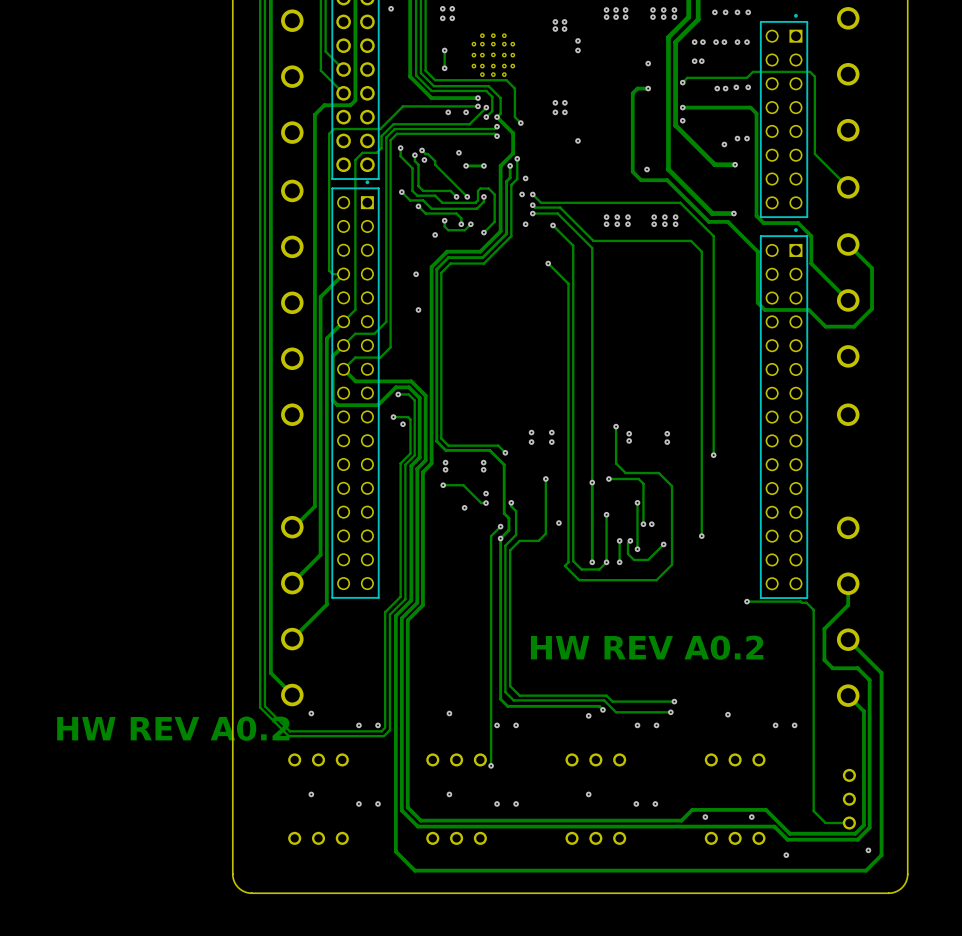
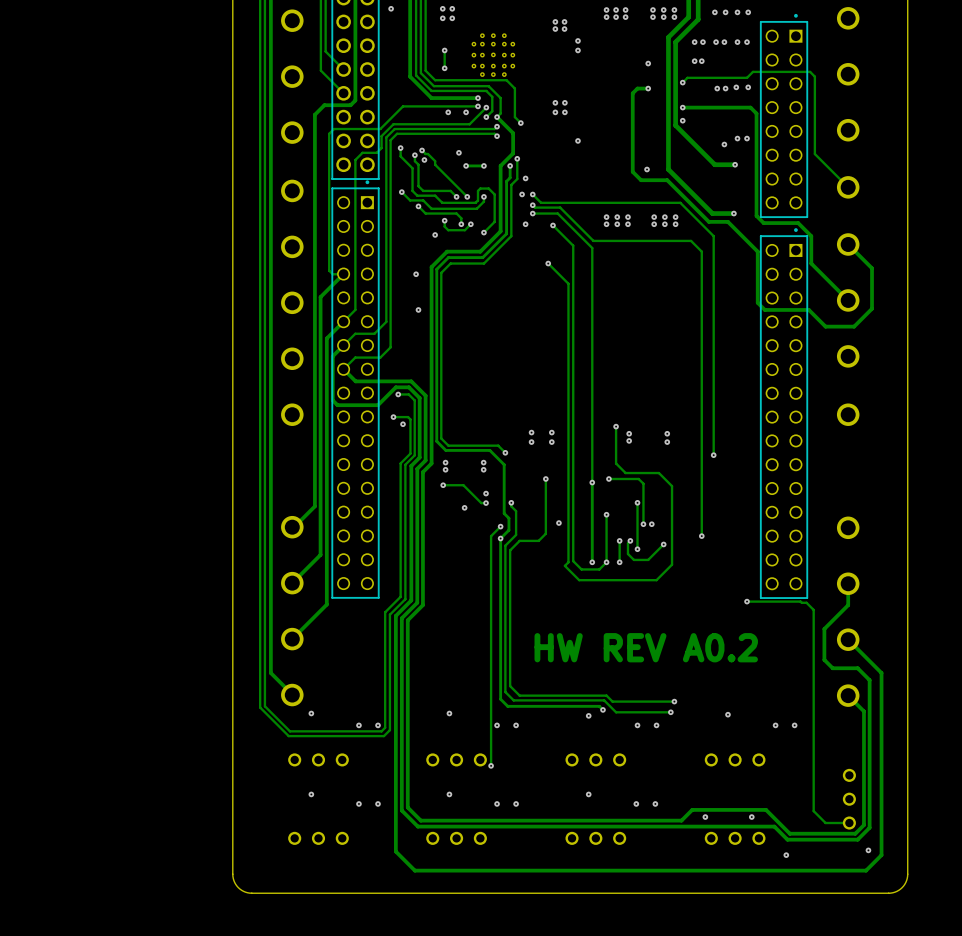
text: HW REV A0.2 (173, 728) -> none

